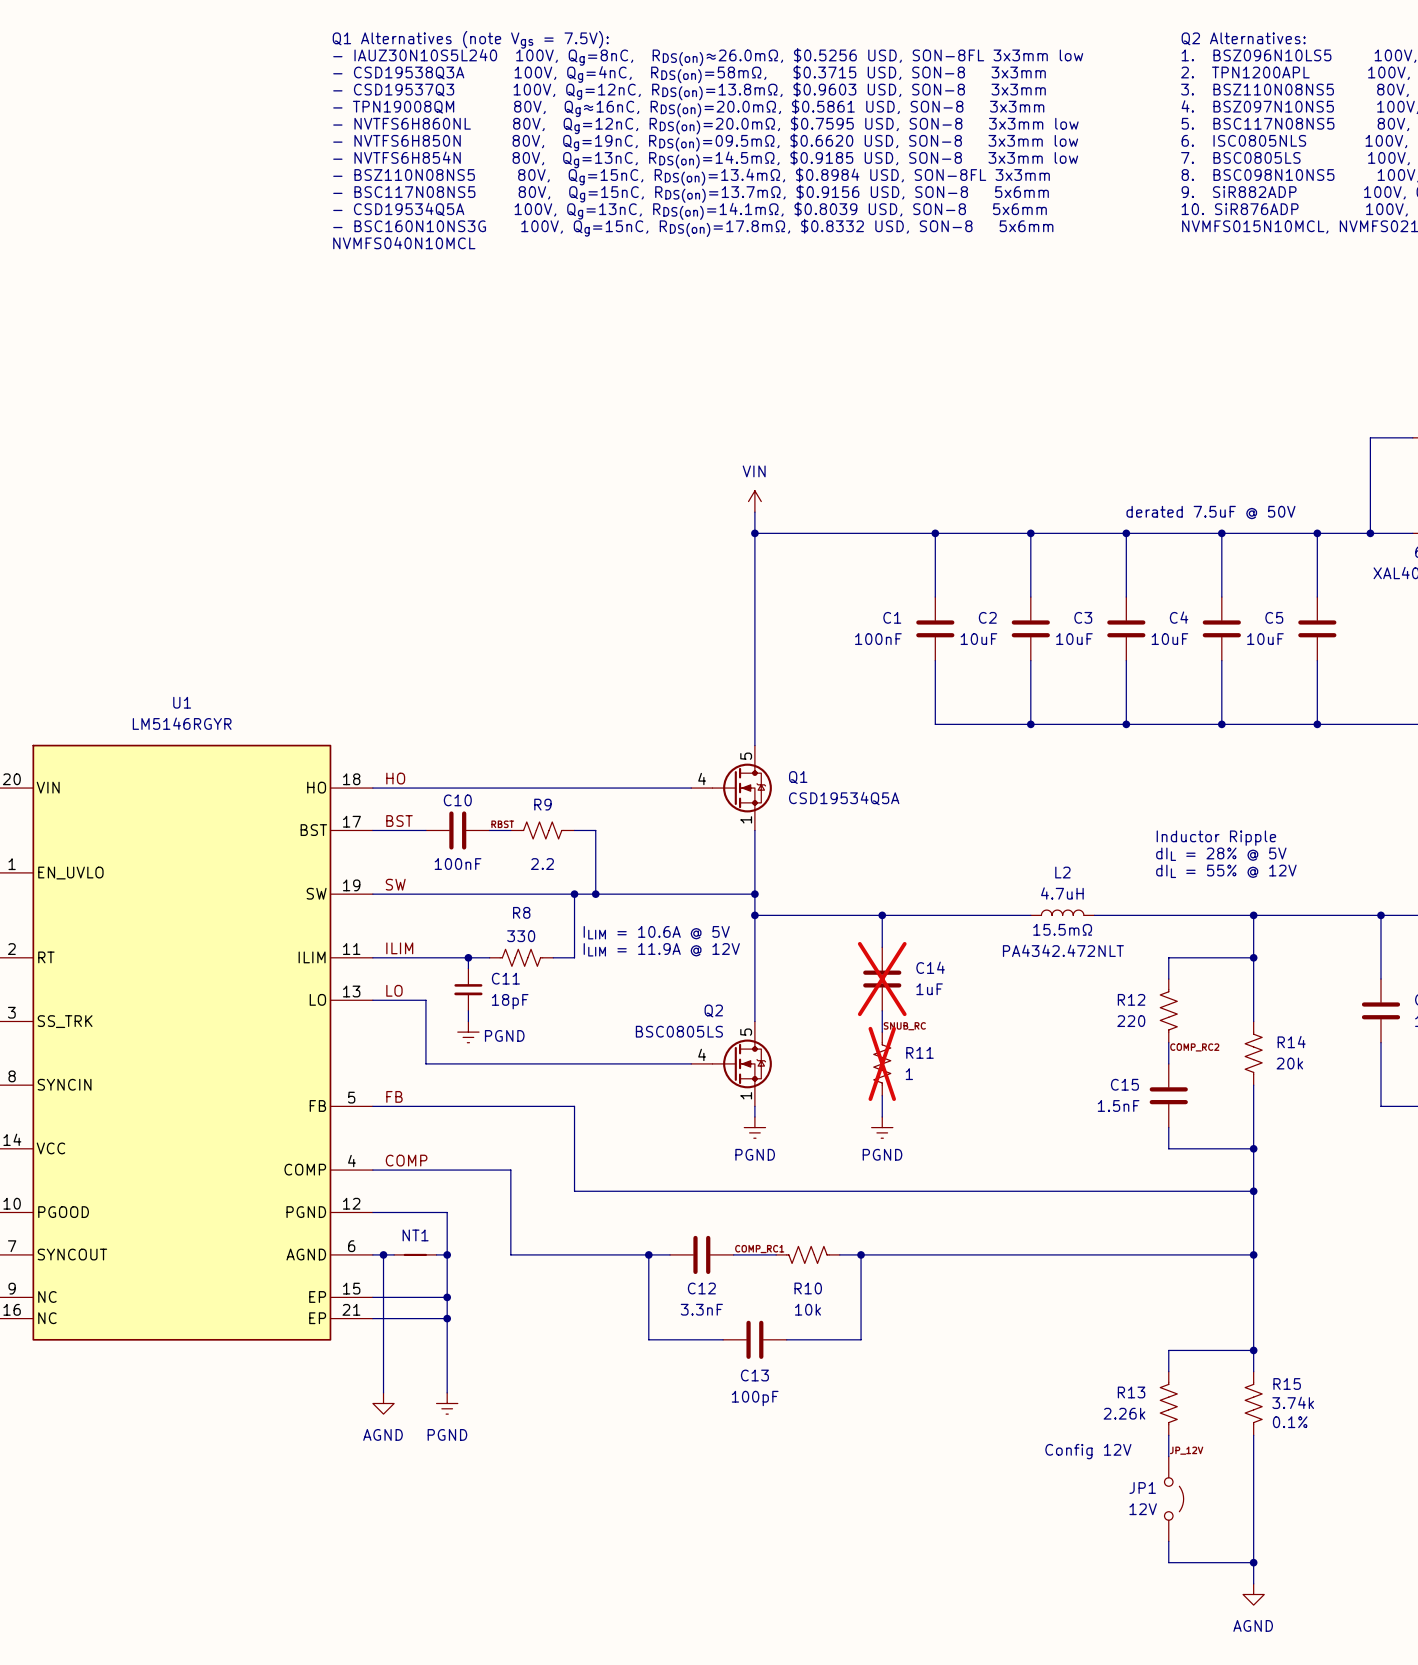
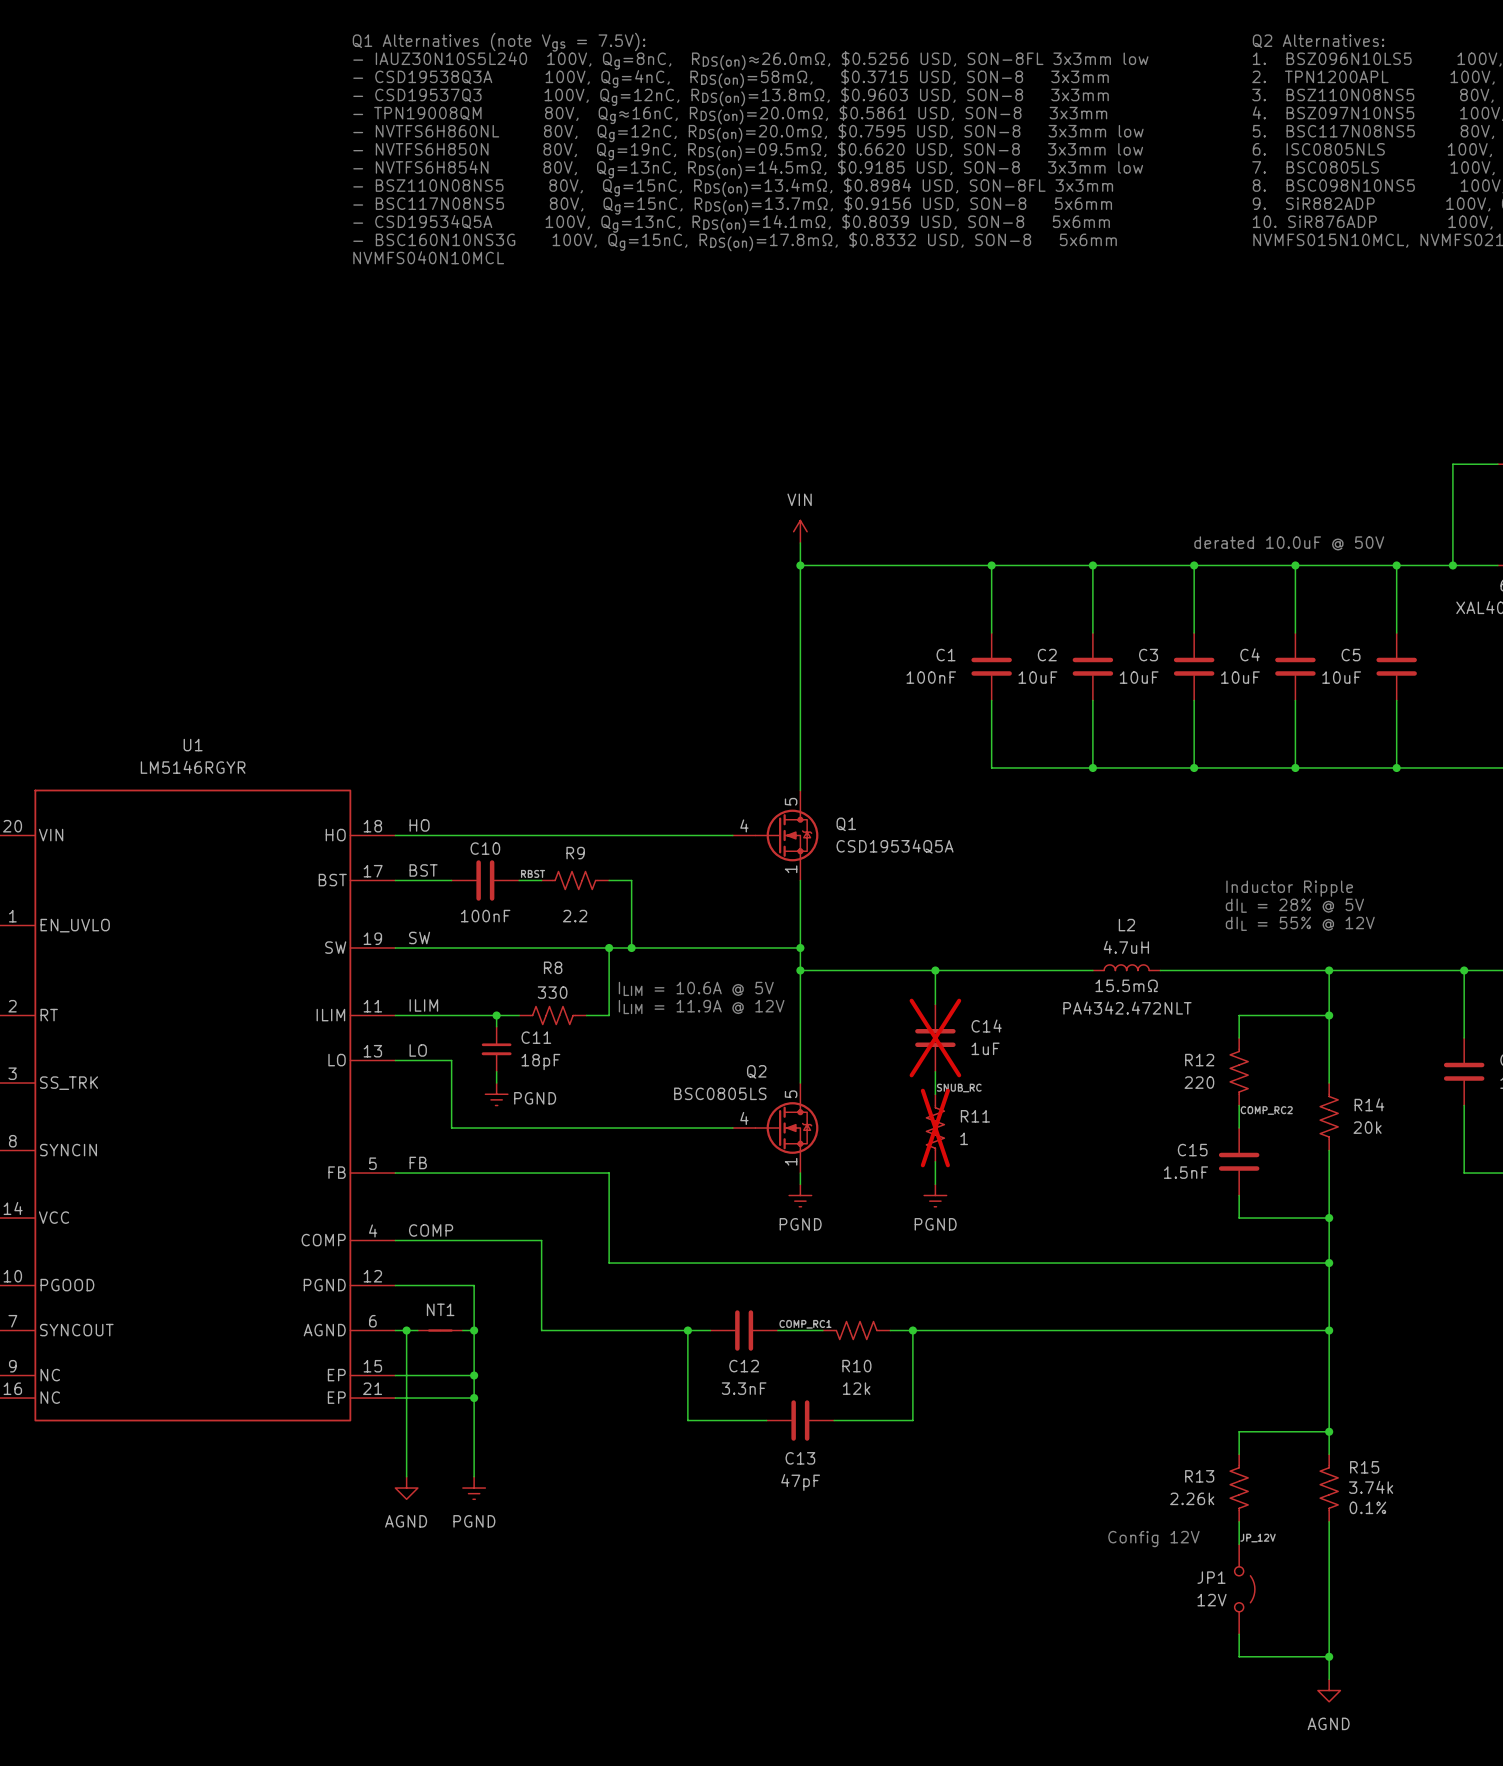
text: derated 7.5uF @ 50V (1210, 512) -> derated 10.0uF @ 50V (1289, 543)
R10 value: 10k (807, 1309) -> 12k (856, 1388)
C13 value: 100pF (755, 1398) -> 47pF (800, 1482)

